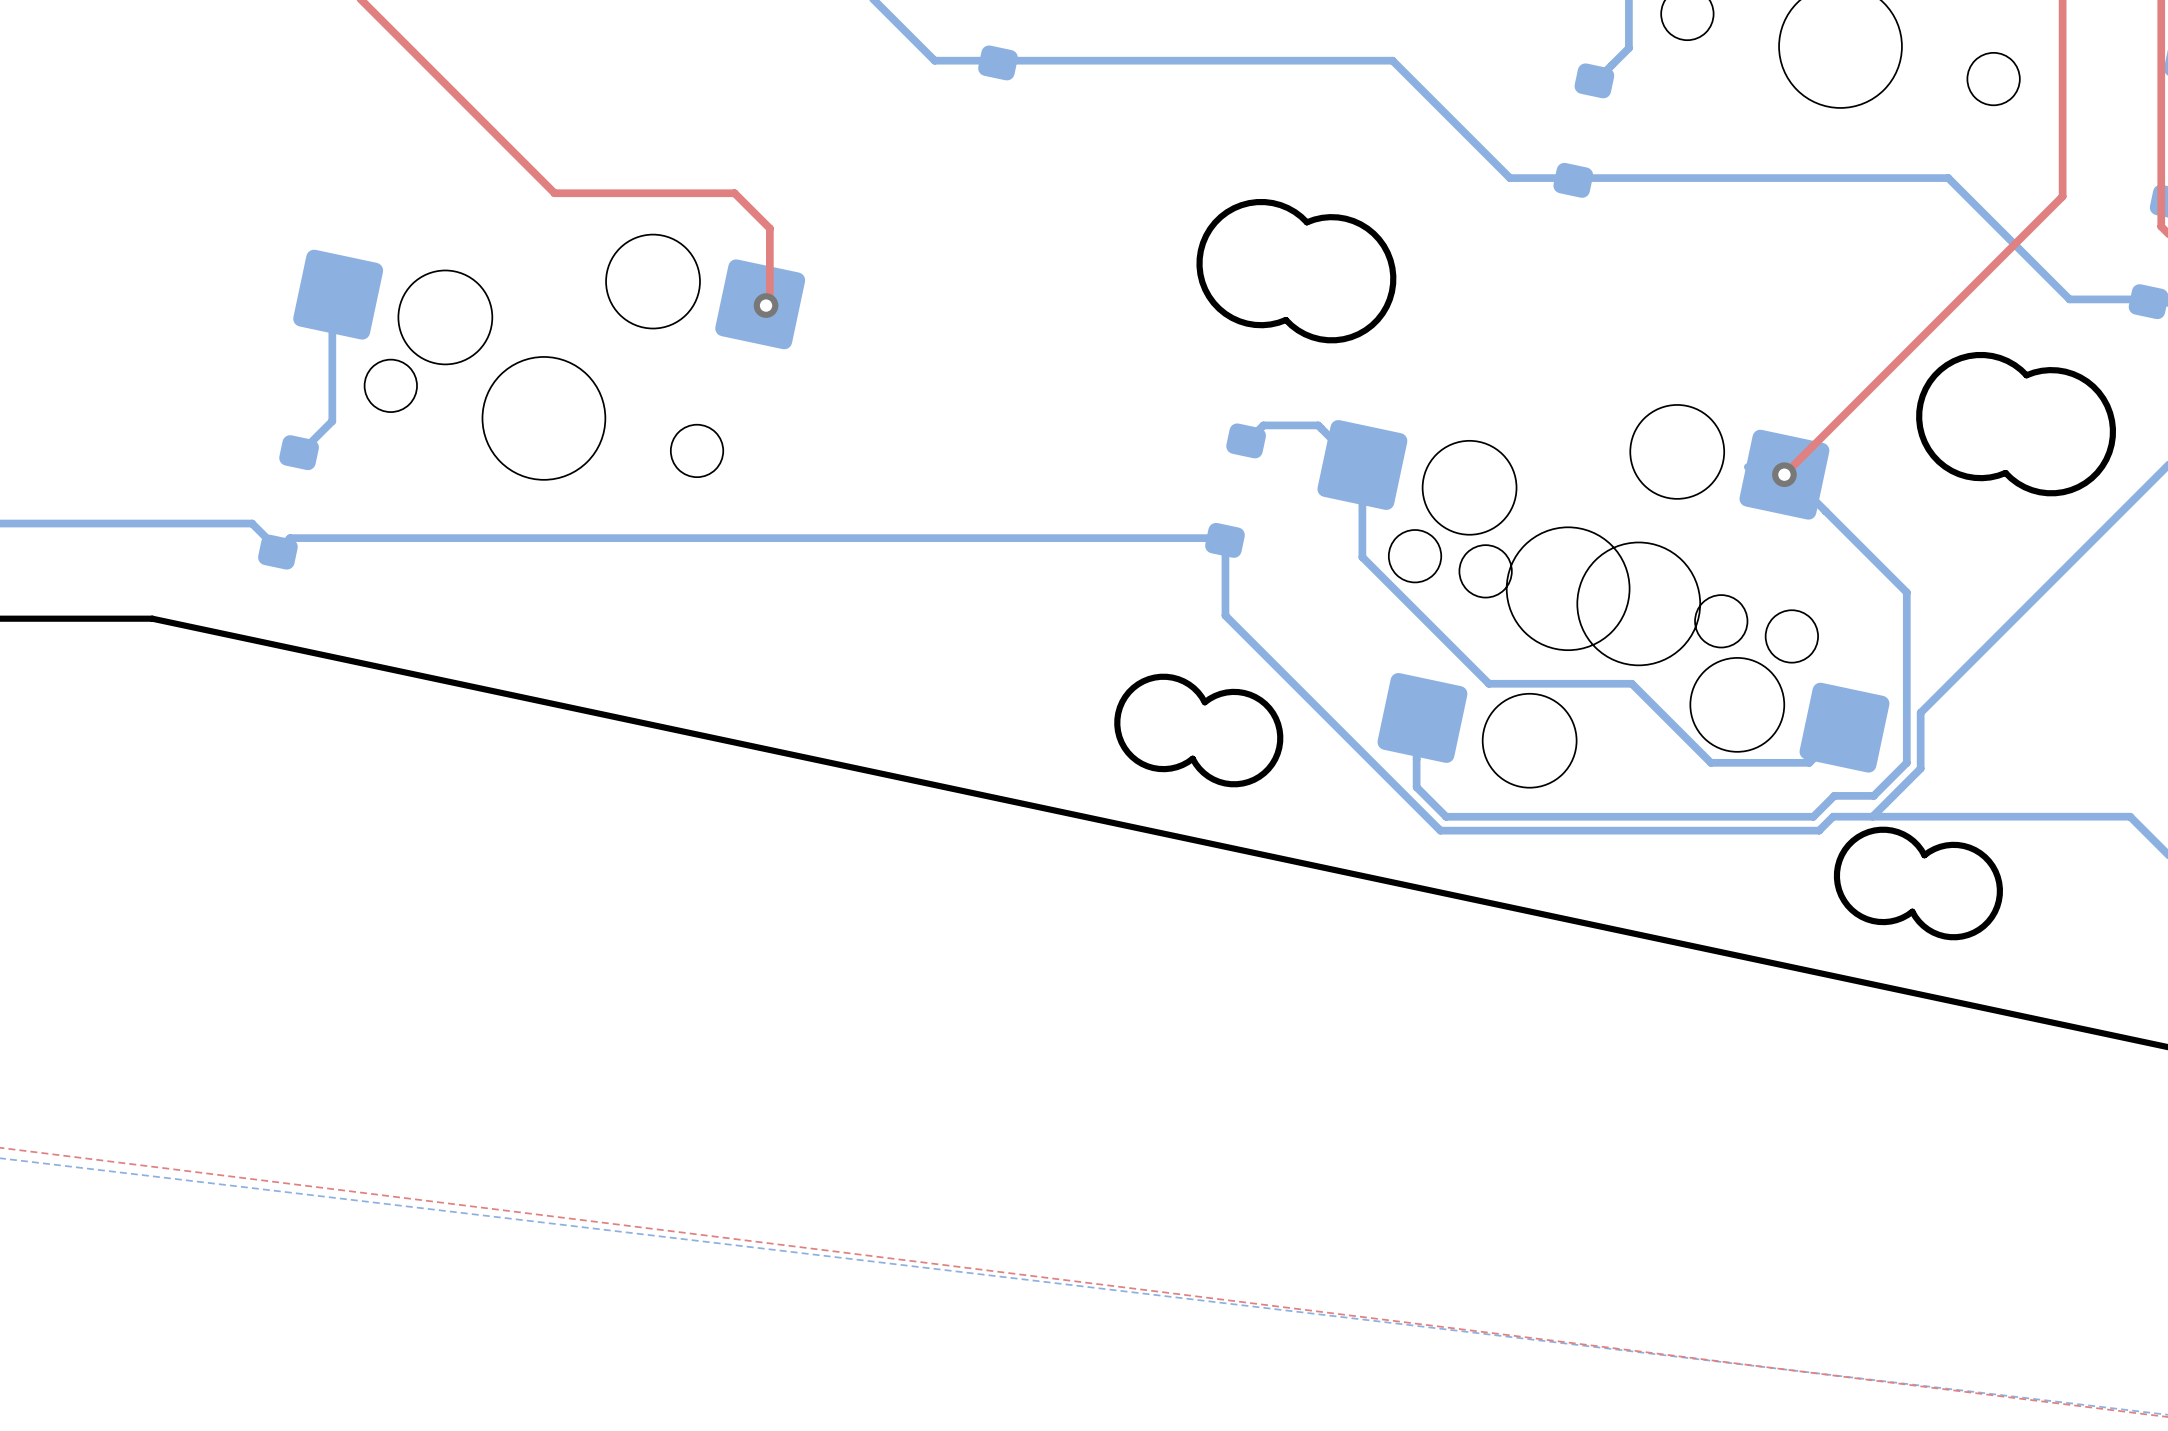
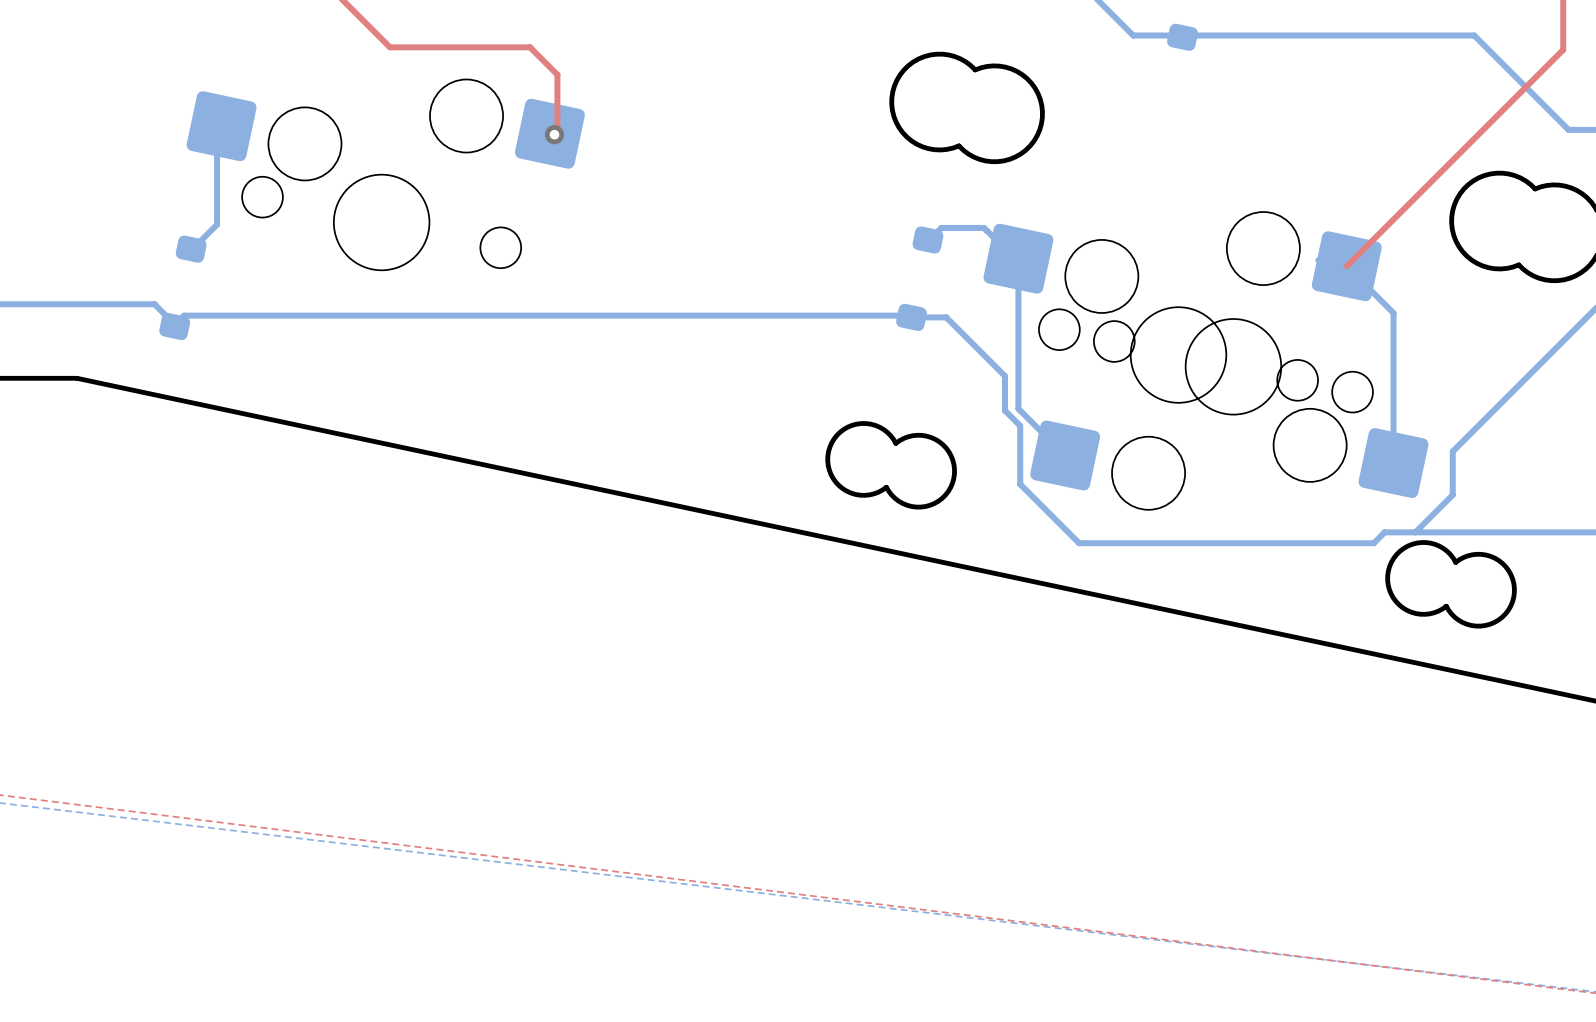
bottom track: none -> (1346, 266) (1393, 313) (1393, 463)
via: (1784, 474) -> none
bottom track: (1790, 475) (1906, 592) (1906, 762) (1873, 795) (1834, 795) (1813, 816) (1446, 816) (1416, 787) (1416, 716) -> none
bottom track: (1225, 538) (1225, 615) (1364, 754) -> (911, 317) (946, 317) (1004, 376) (1004, 410) (1020, 425) (1020, 484)
bottom track: (1362, 557) (1488, 683) (1631, 683) (1710, 762) (1809, 762) (1844, 727) -> (1018, 330) (1018, 408) (1065, 455)

